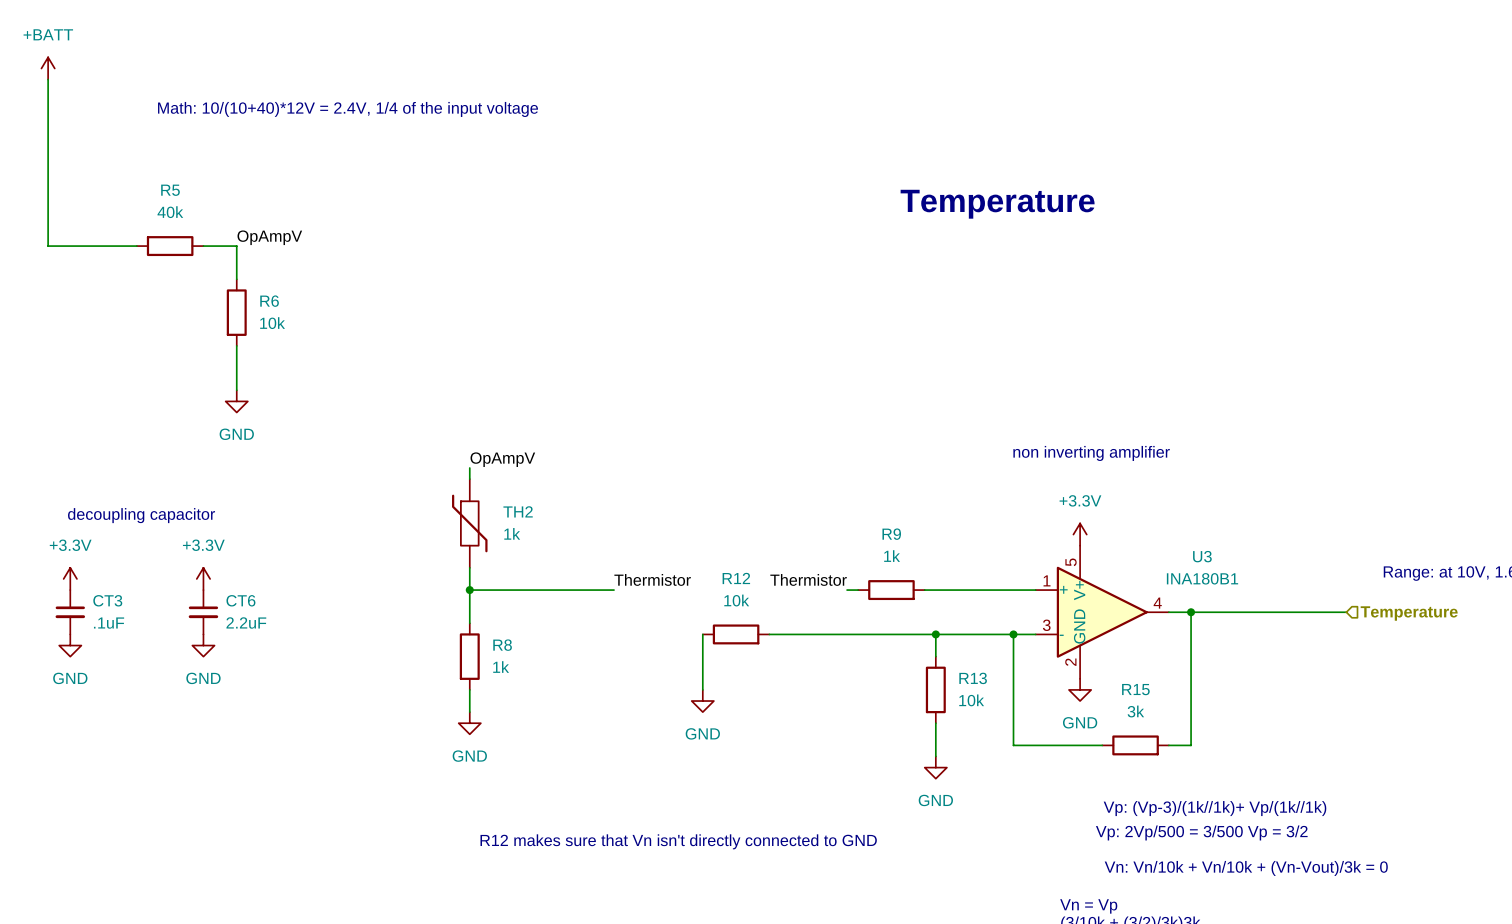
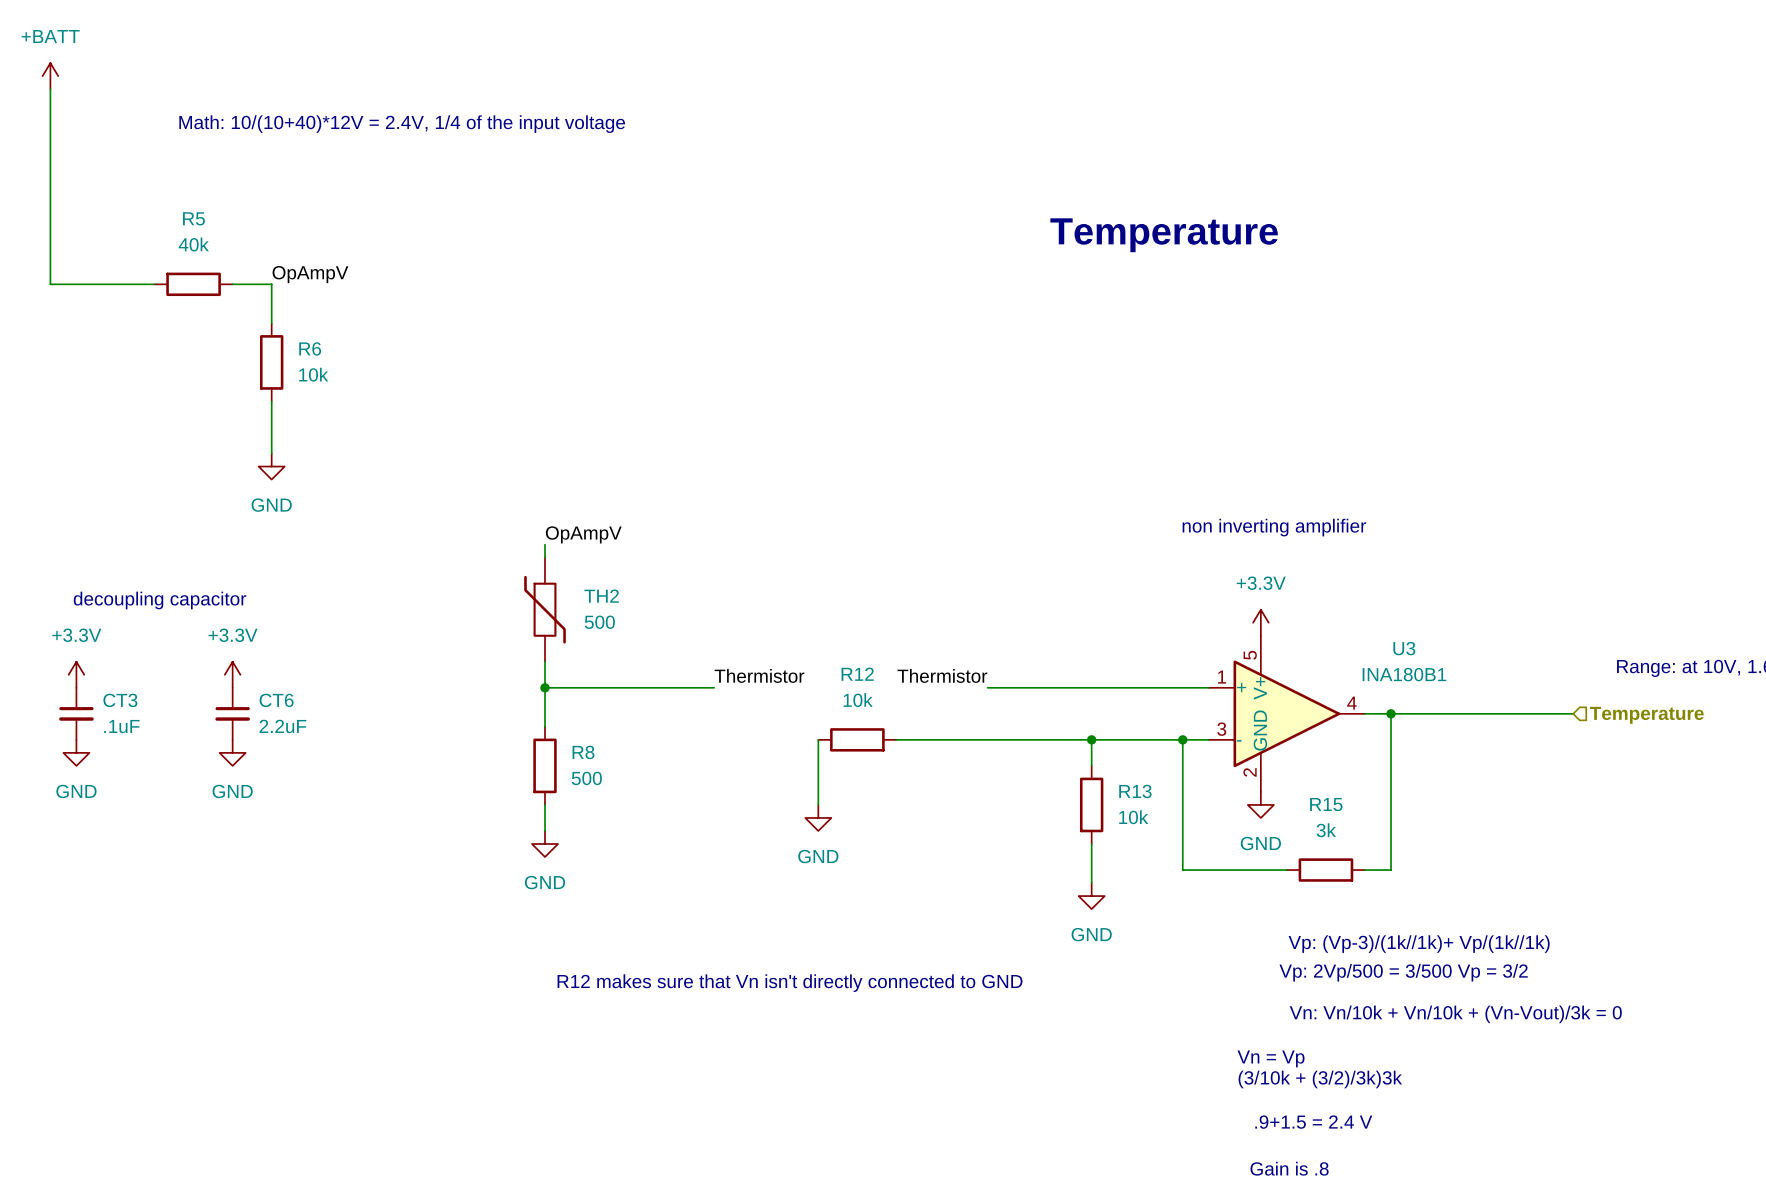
TH2 value: 1k (512, 533) -> 500 (599, 622)
wire: none -> (1000, 687) (1078, 687)
R9: 1k (891, 590) -> none
R8 value: 1k (501, 667) -> 500 (586, 778)

